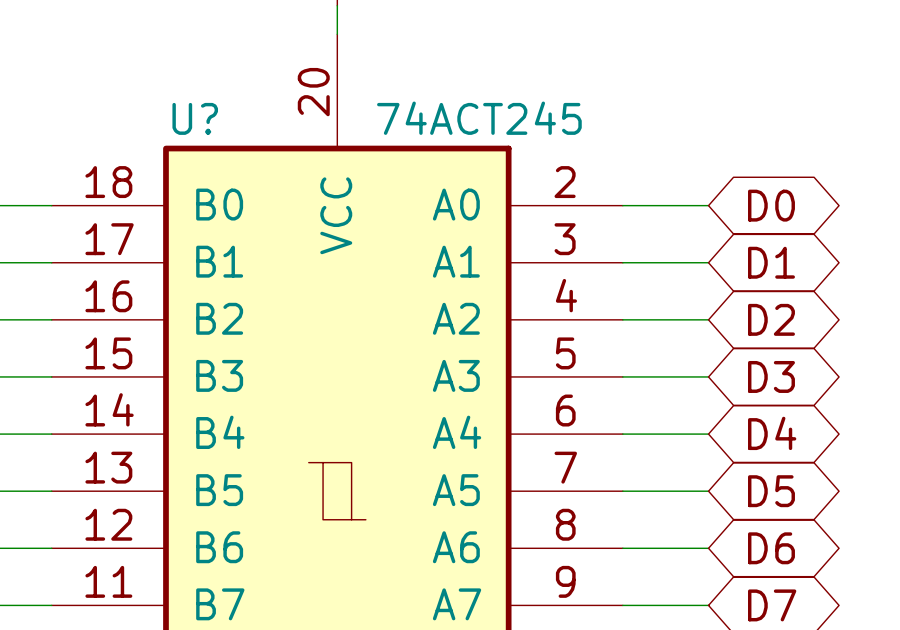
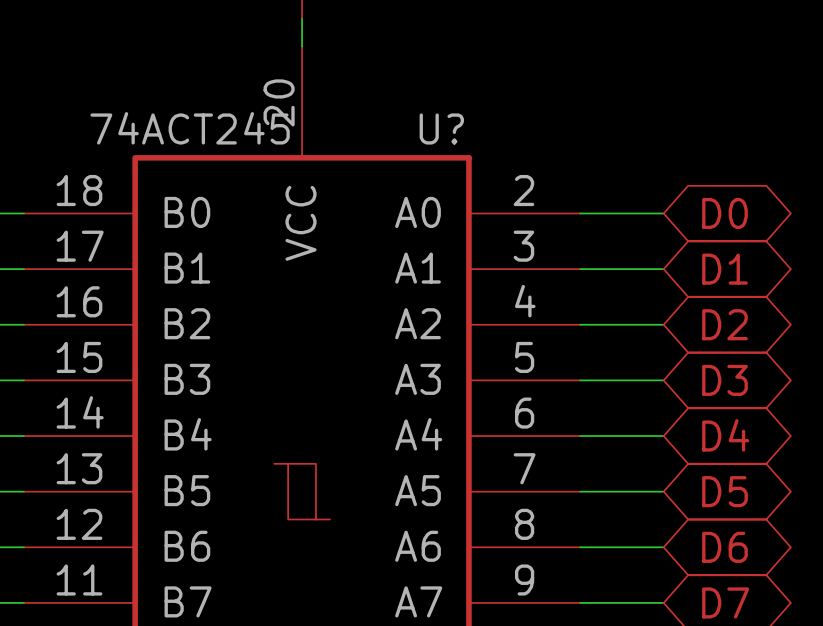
U? name position: U? (195, 118) -> U? (441, 128)
U? value position: 74ACT245 (479, 118) -> 74ACT245 (190, 128)

